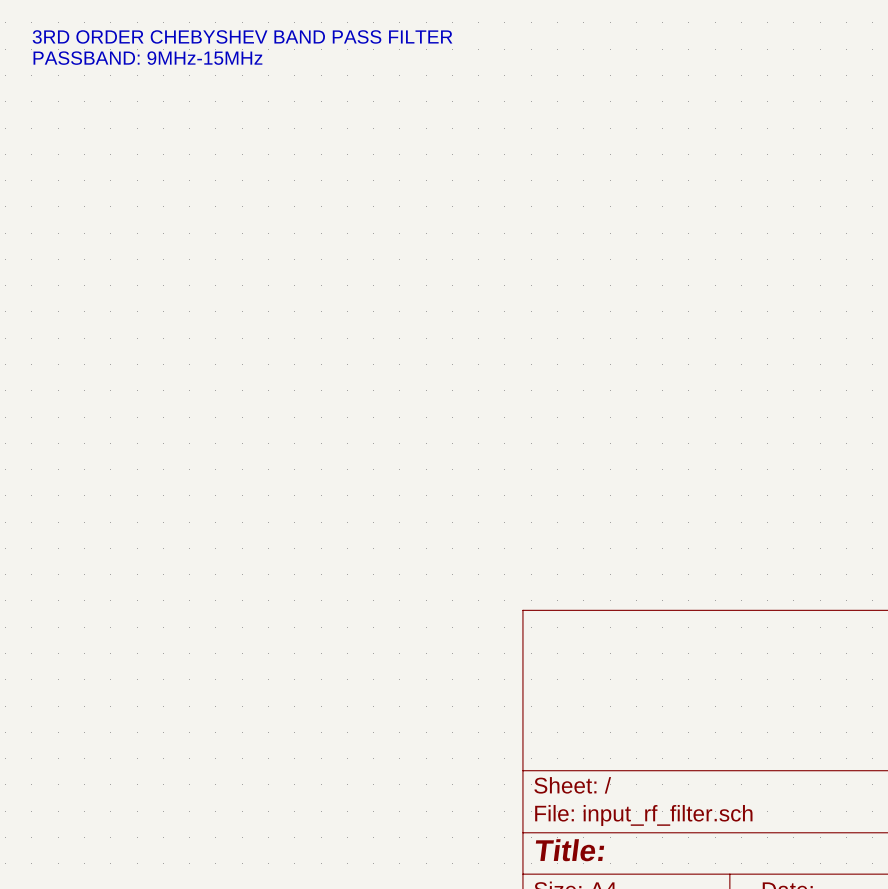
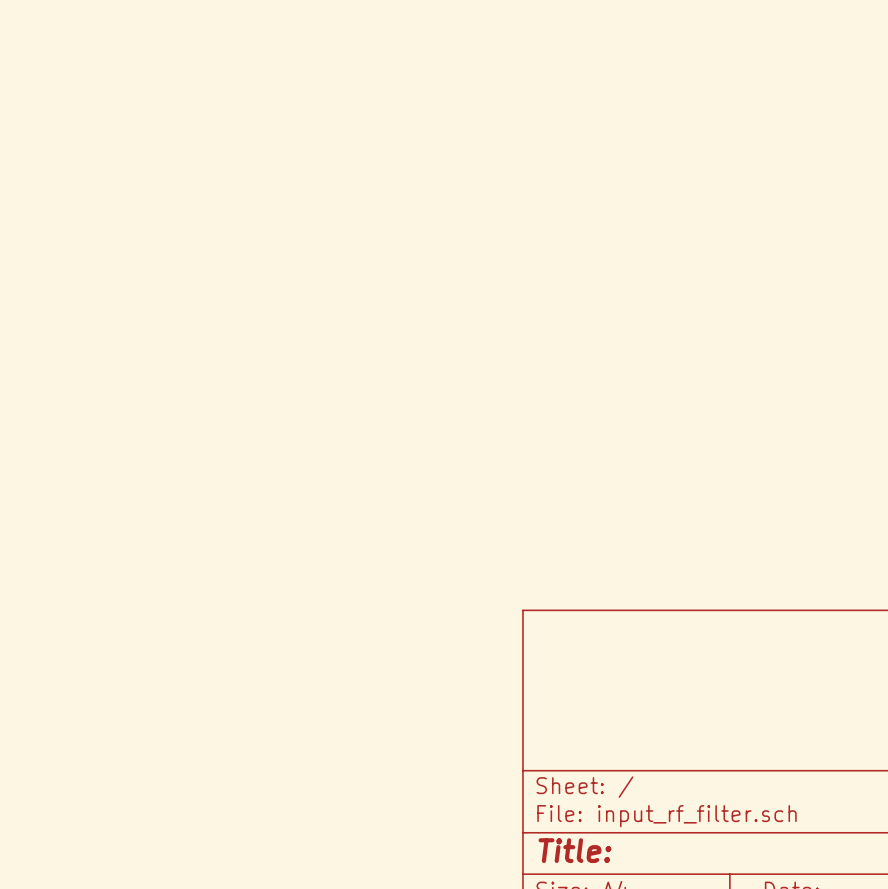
text: 3RD ORDER CHEBYSHEV BAND PASS FILTER (242, 36) -> none
text: PASSBAND: 9MHz-15MHz (147, 58) -> none

